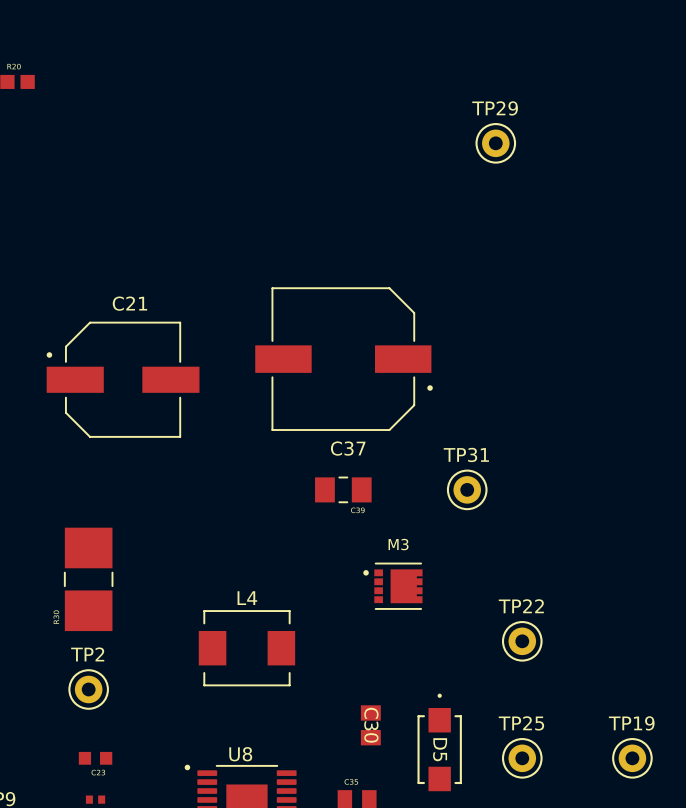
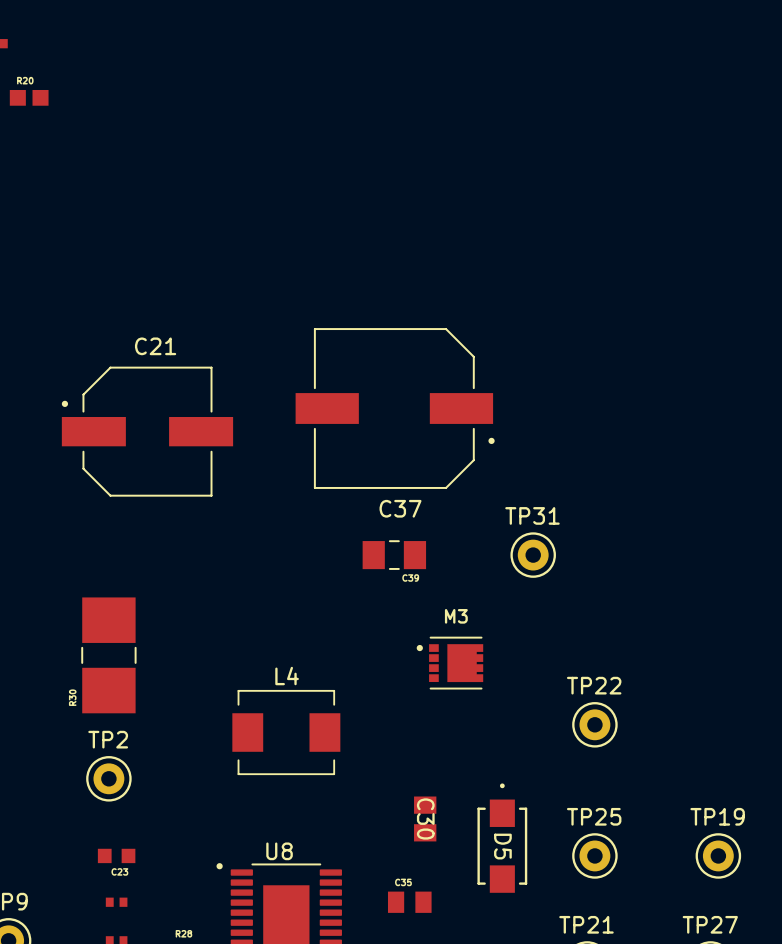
TP29: (495, 143) -> none

